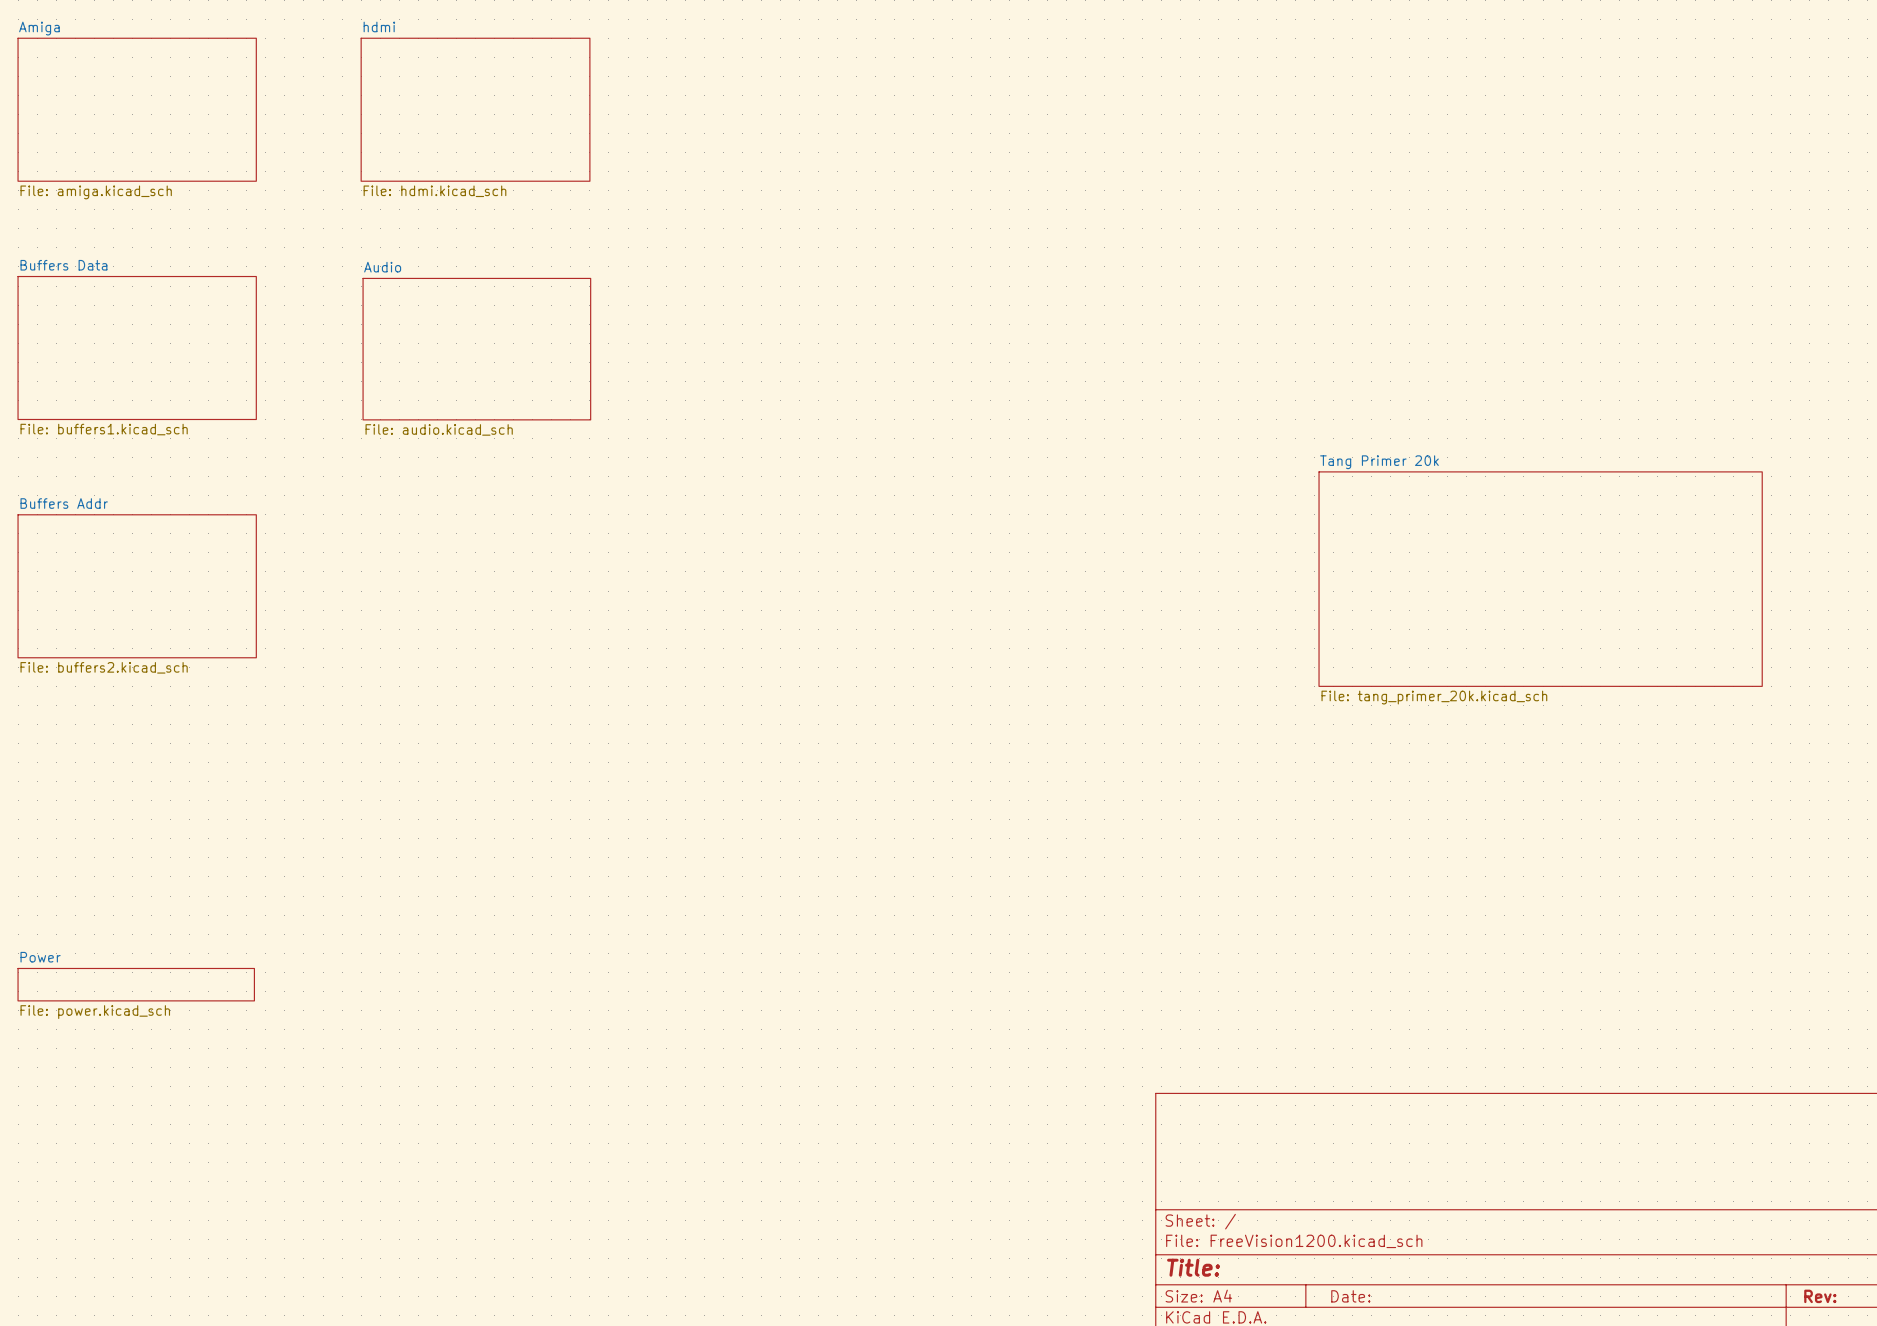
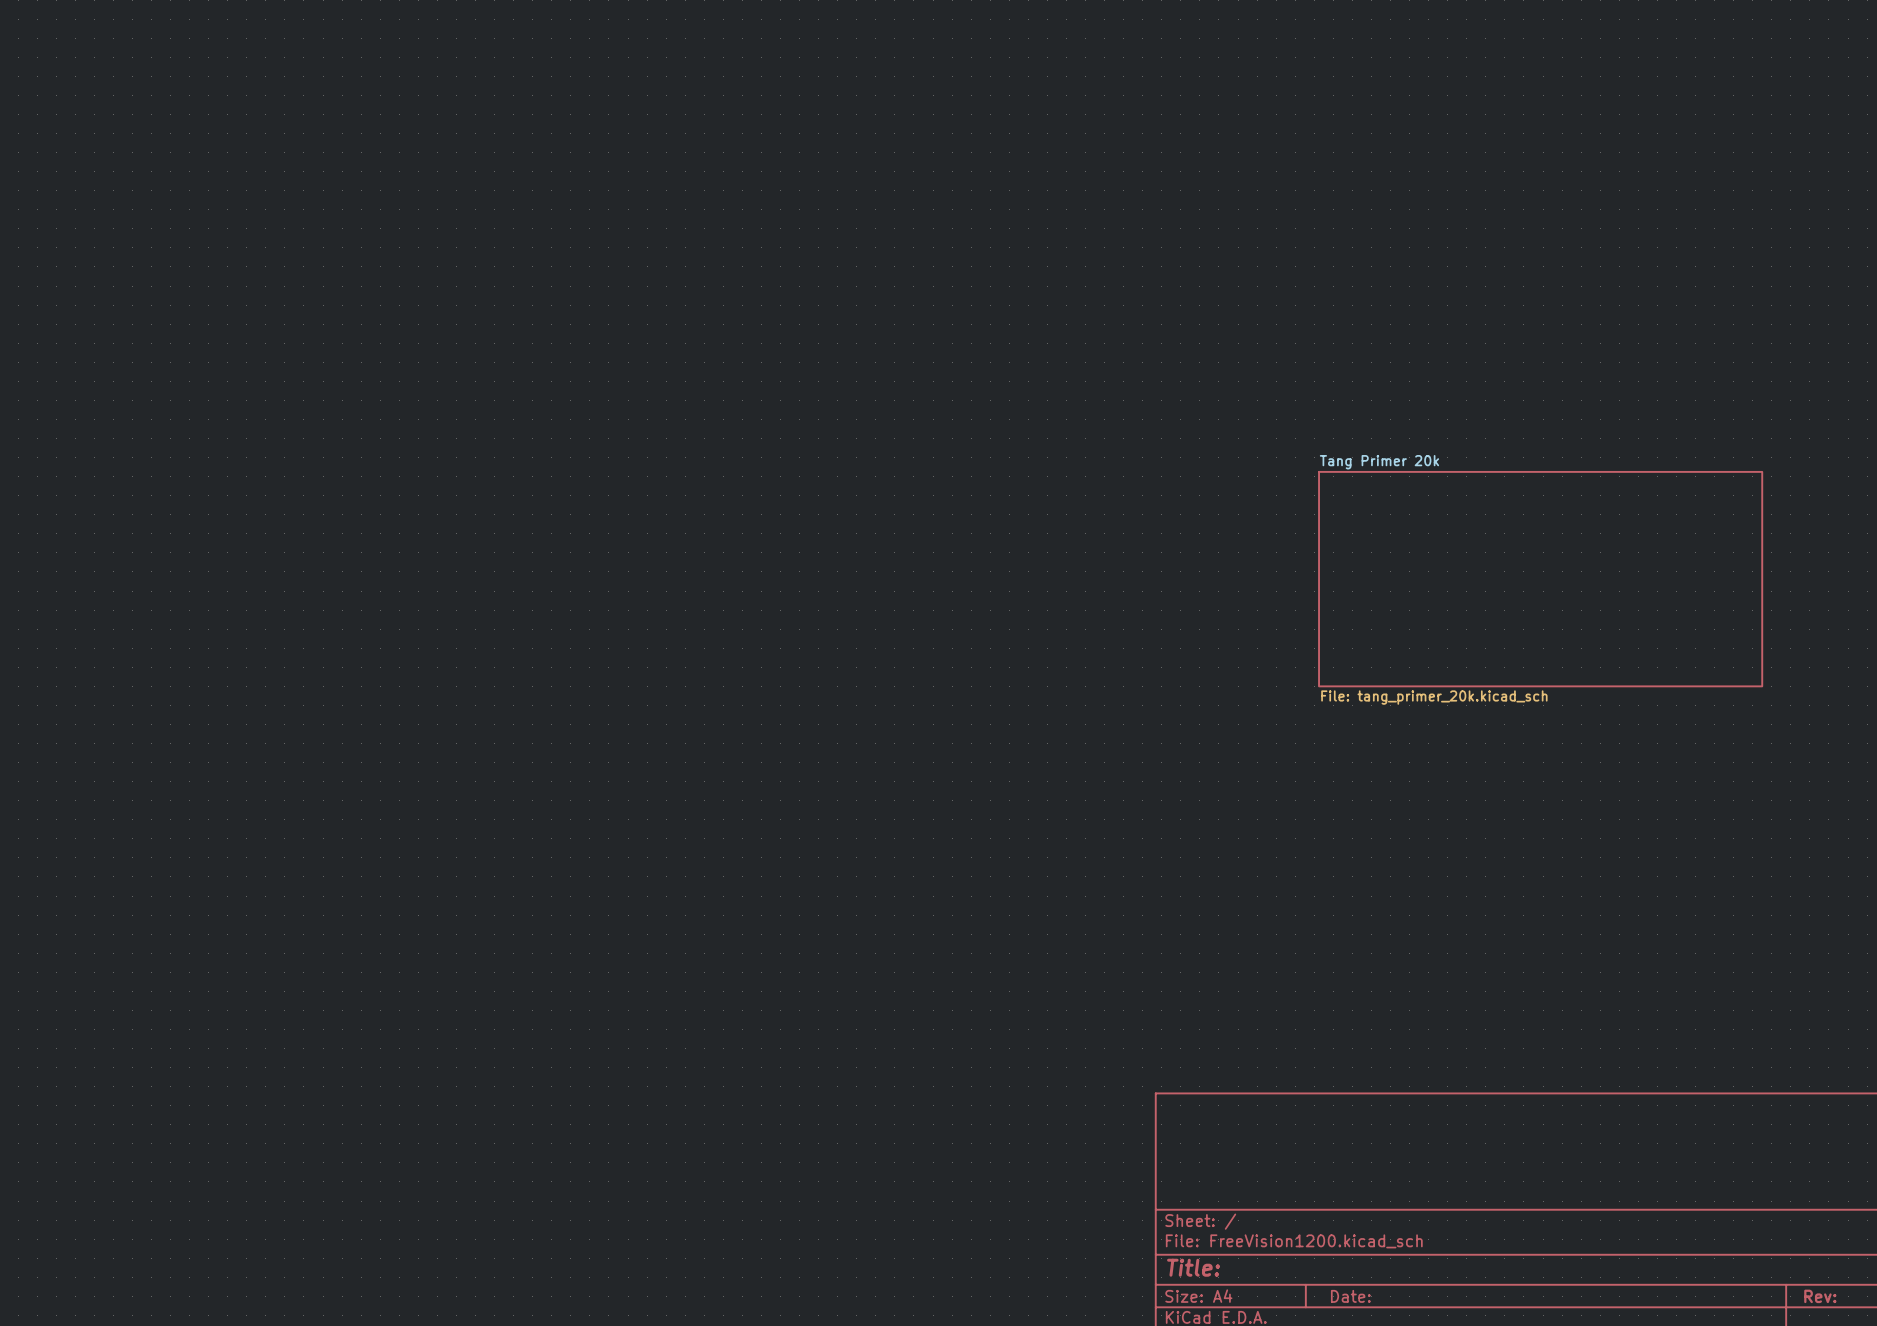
sheet Amiga: File: amiga.kicad_sch (137, 109) -> none
sheet hdmi: File: hdmi.kicad_sch (475, 109) -> none
sheet Buffers Data: File: buffers1.kicad_sch (137, 348) -> none
sheet Audio: File: audio.kicad_sch (476, 349) -> none
sheet Buffers Addr: File: buffers2.kicad_sch (137, 586) -> none
sheet Power: File: power.kicad_sch (136, 984) -> none

